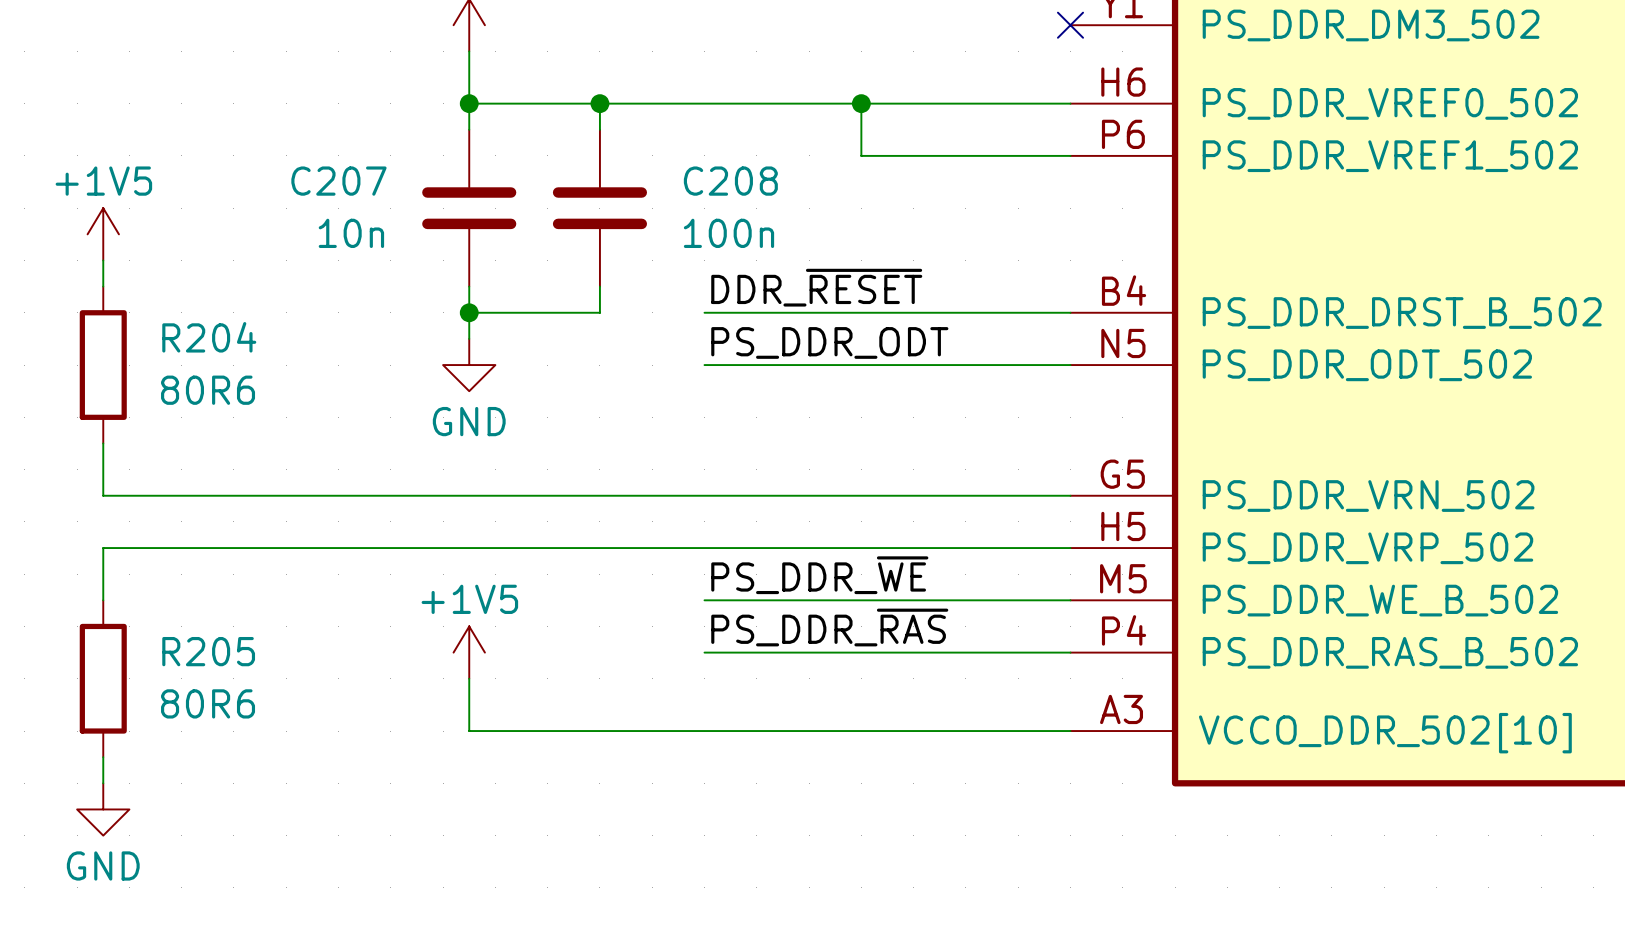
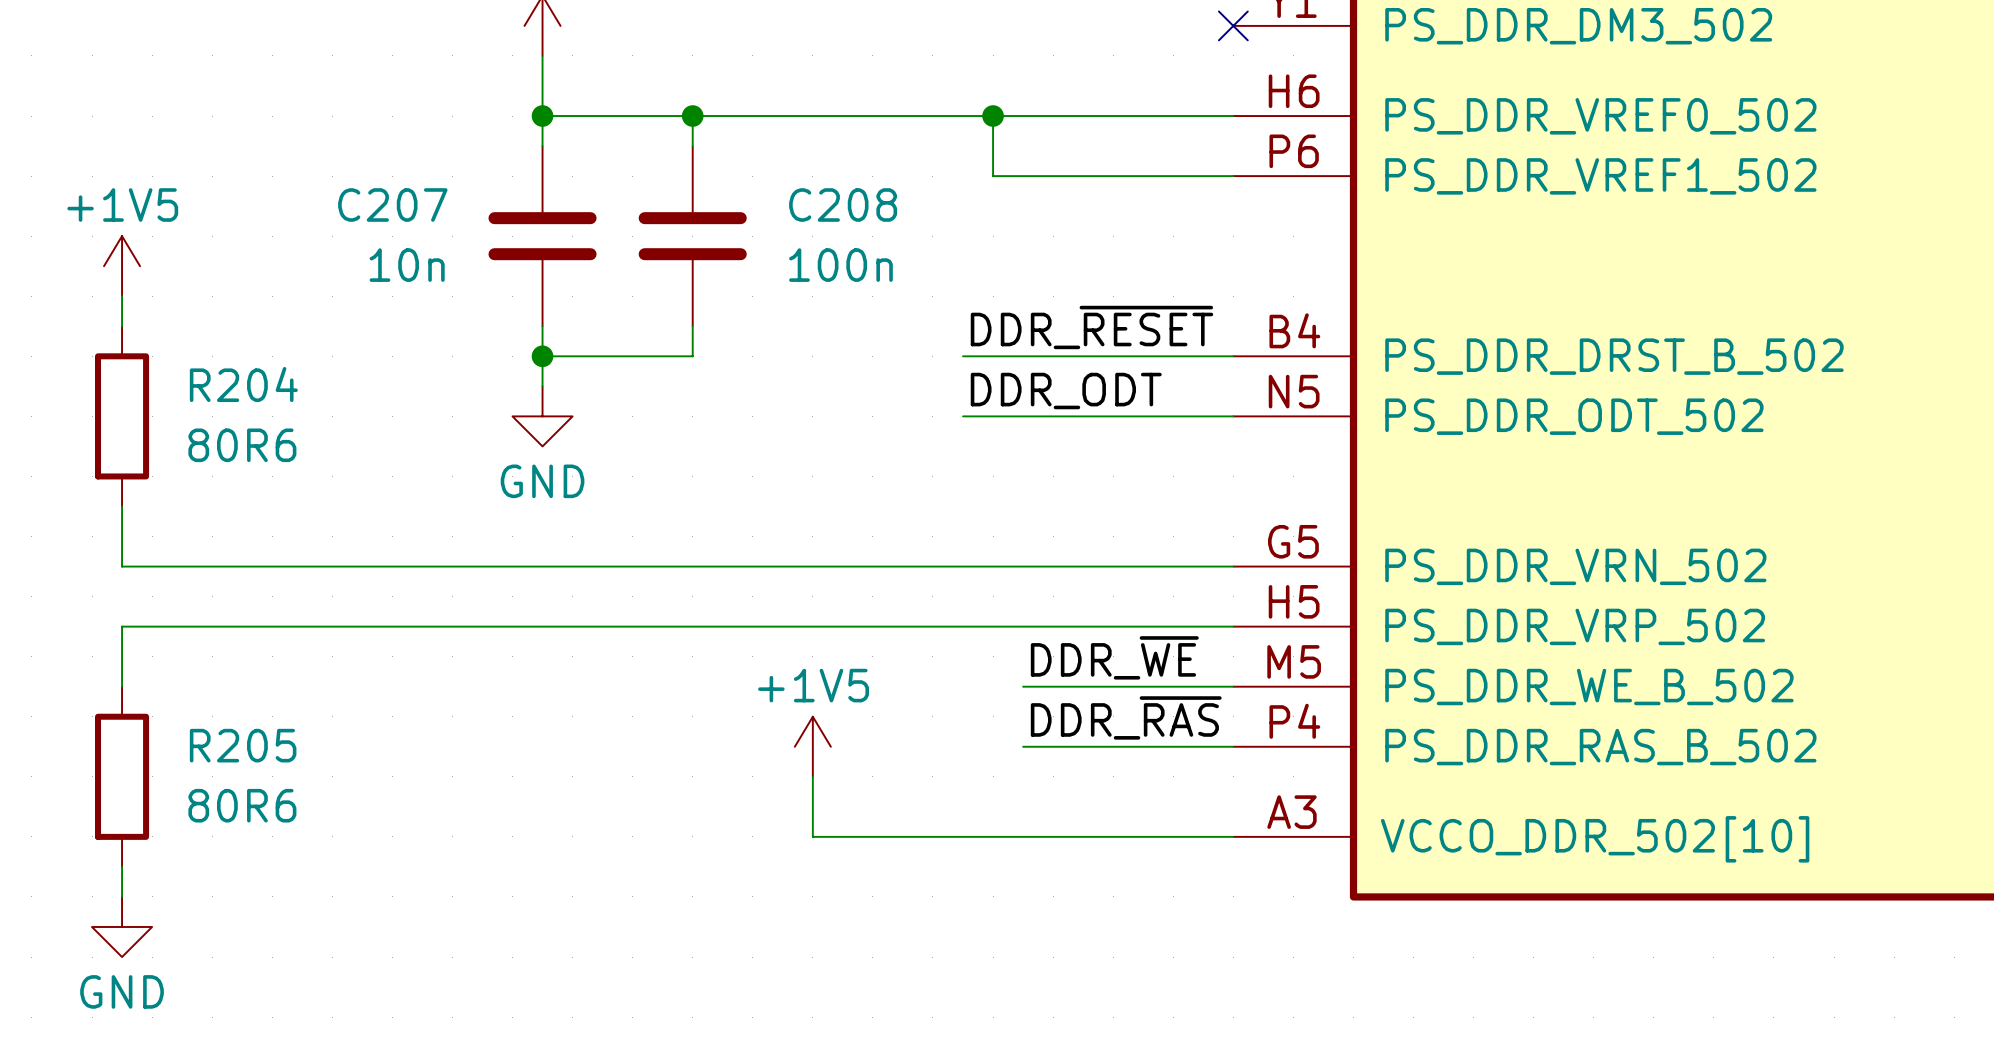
label position: DDR_~{RESET} (816, 287) -> DDR_~{RESET} (1091, 327)
wire: (704, 312) (835, 312) -> none
label: PS_DDR_ODT (829, 342) -> DDR_ODT (1066, 391)
wire: (704, 365) (835, 365) -> none
label: PS_DDR_~{WE} (819, 575) -> none
label: none -> DDR_~{WE} (1114, 657)
wire: (704, 600) (887, 600) -> none
label: PS_DDR_~{RAS} (829, 627) -> none
label: none -> DDR_~{RAS} (1126, 717)
power symbol position: +1V5 (469, 652) -> +1V5 (812, 746)
wire: (704, 652) (887, 652) -> none
wire: (469, 678) (469, 731) (704, 731) -> (812, 776) (812, 836)

